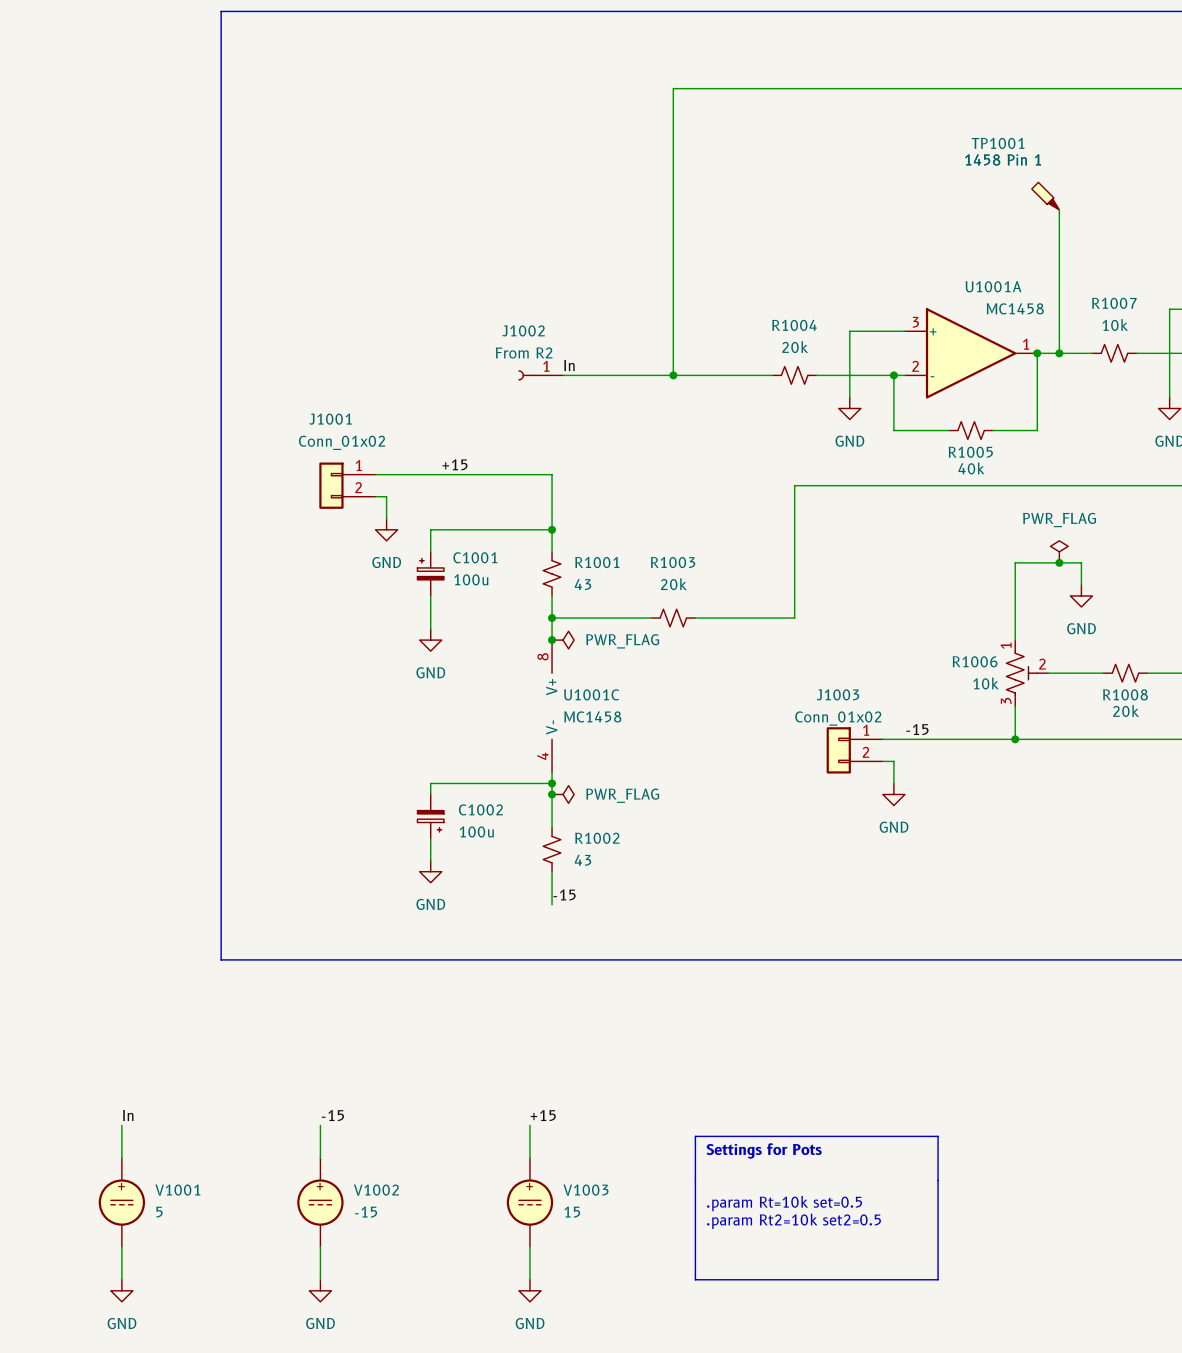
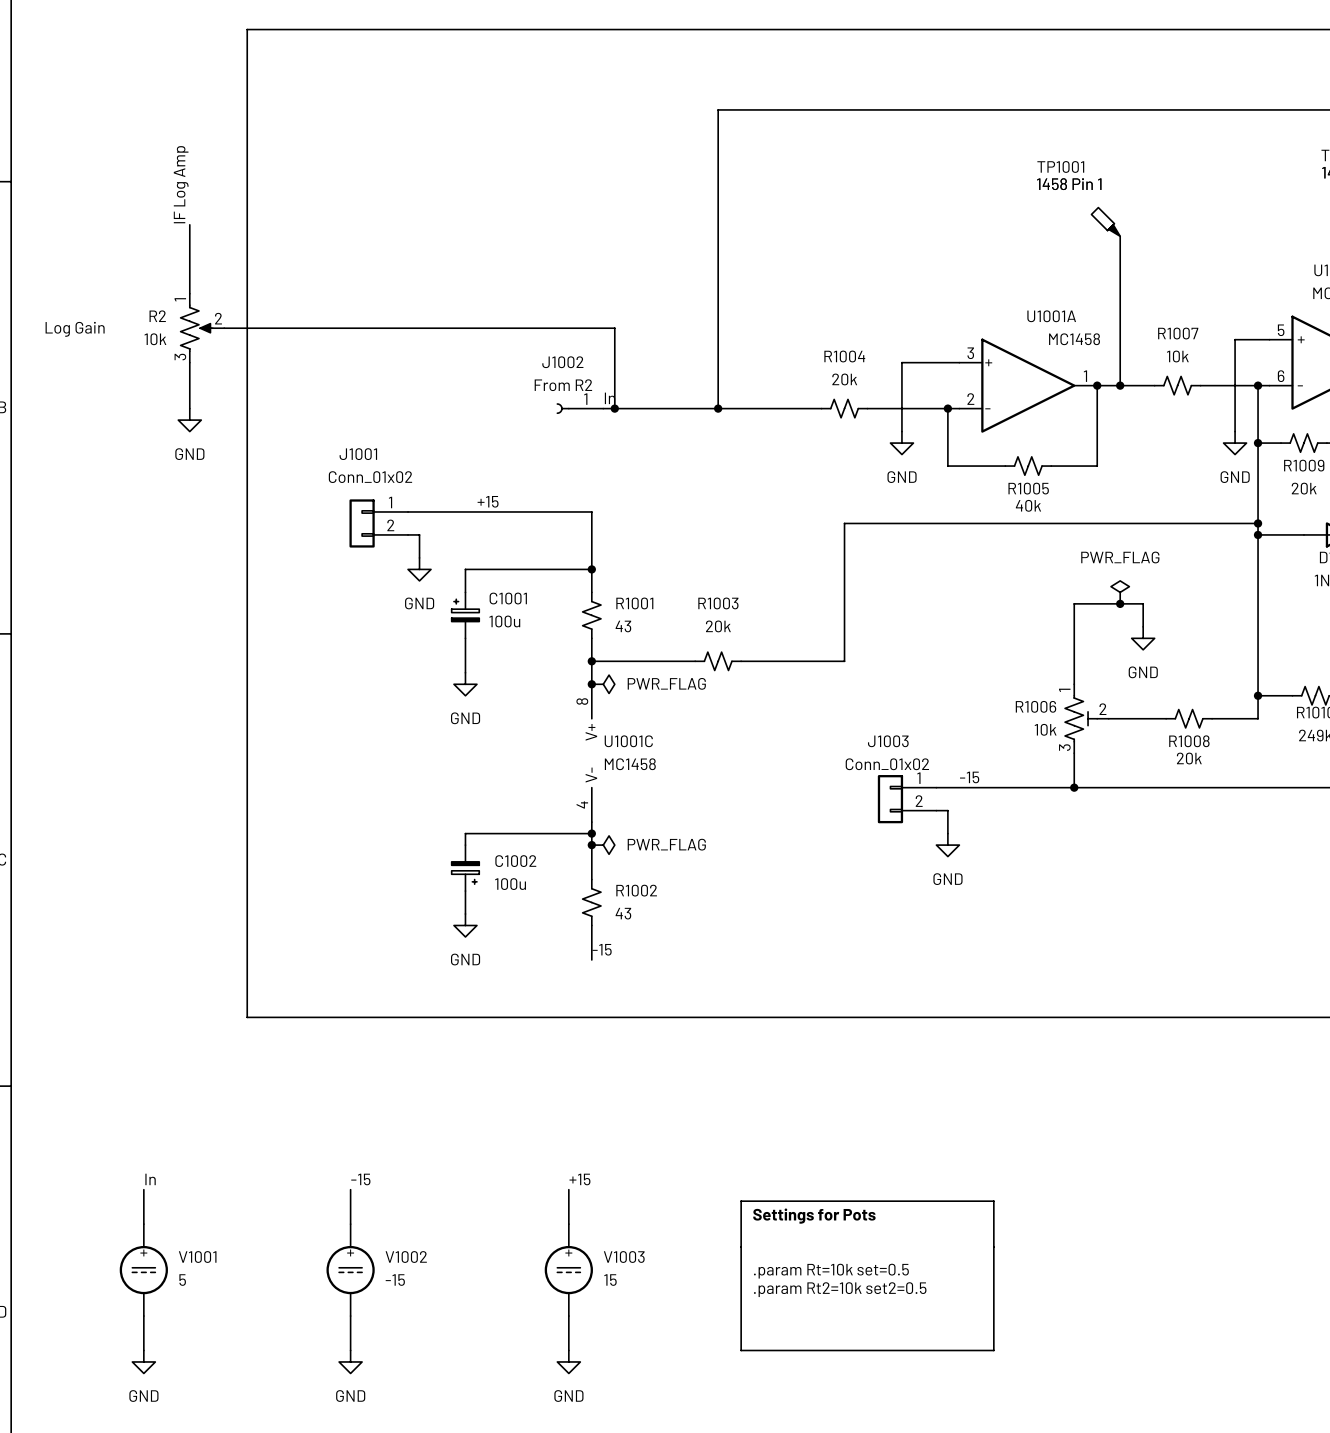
label: none -> IF Log Amp (181, 184)
wire: none -> (189, 224) (189, 293)
R2: none -> 10k (202, 328)
wire: none -> (224, 328) (614, 328) (614, 408)
wire: none -> (189, 362) (189, 408)
junction: none -> (614, 408)
power symbol: none -> GND (189, 420)

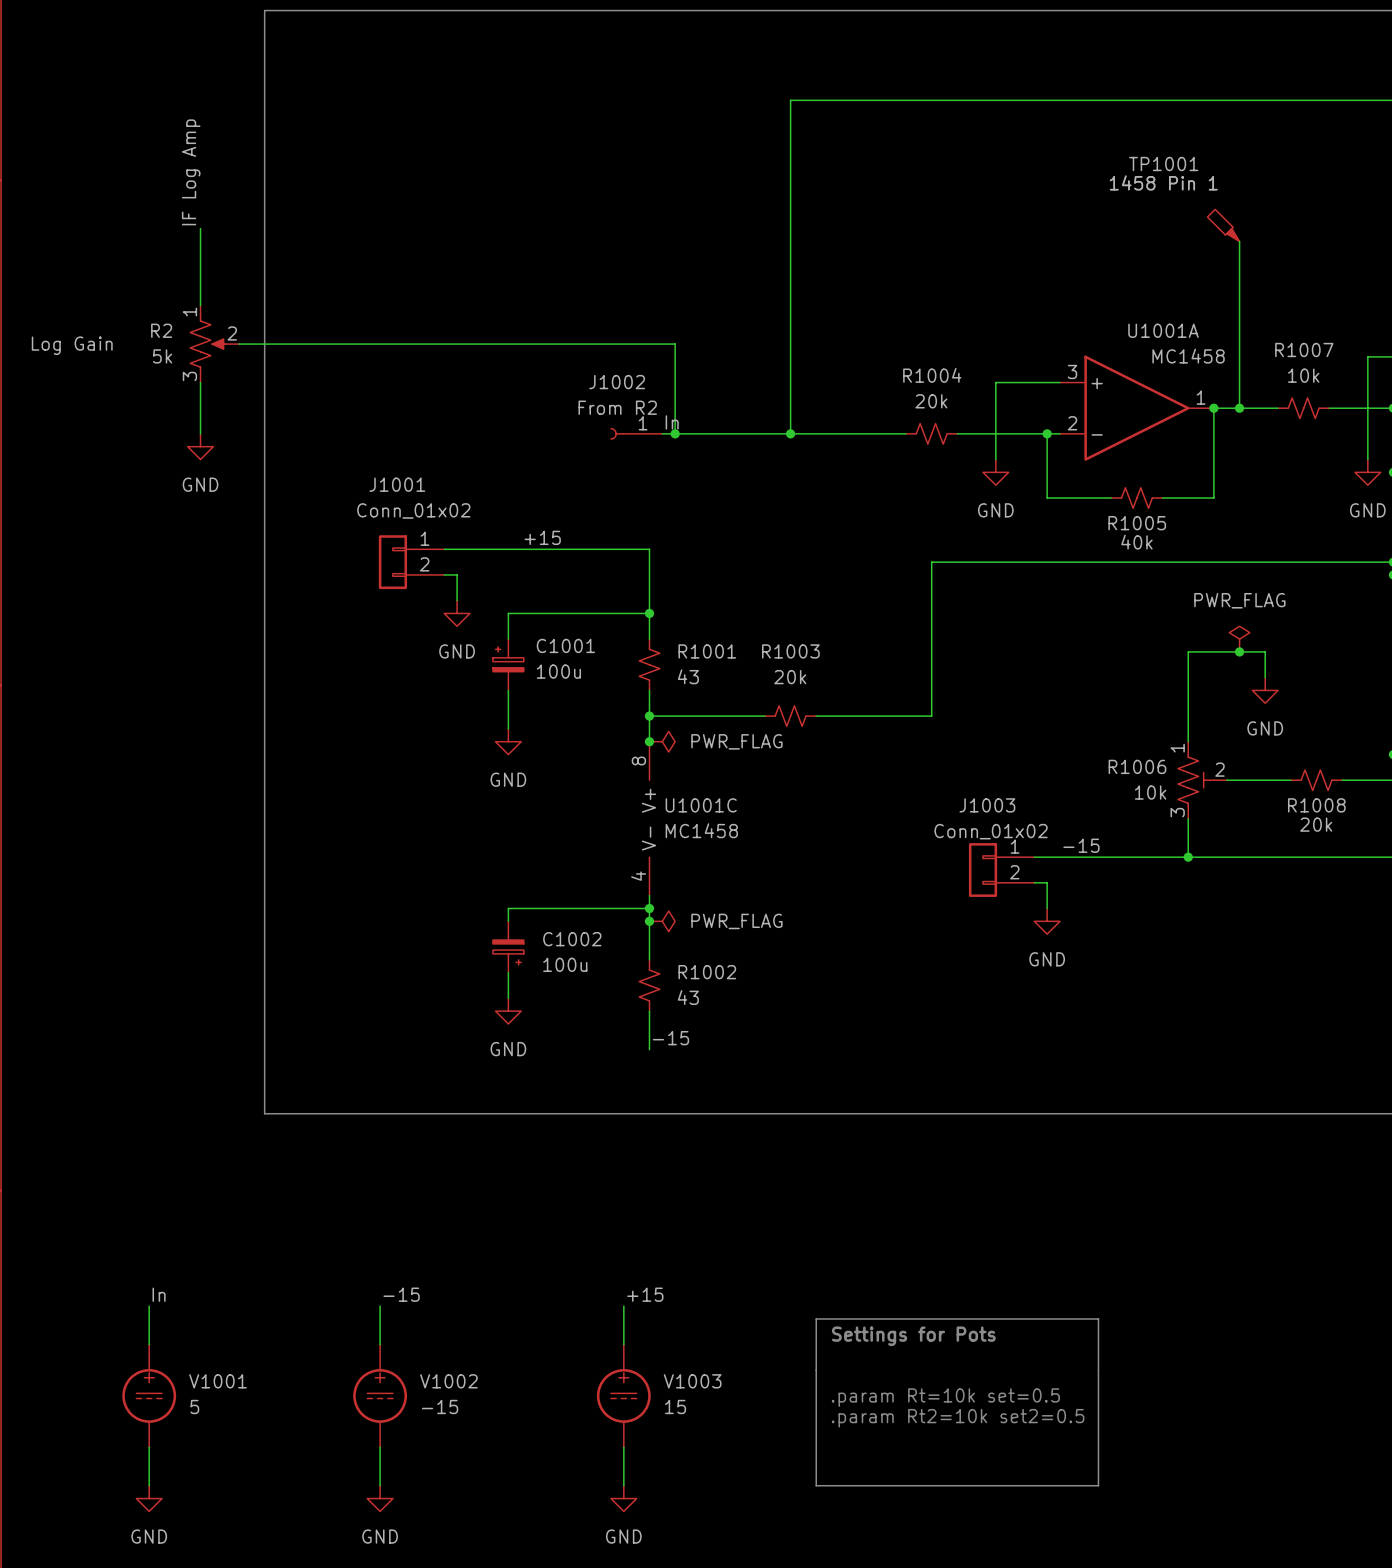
R2 value: 10k (155, 339) -> 5k (162, 356)

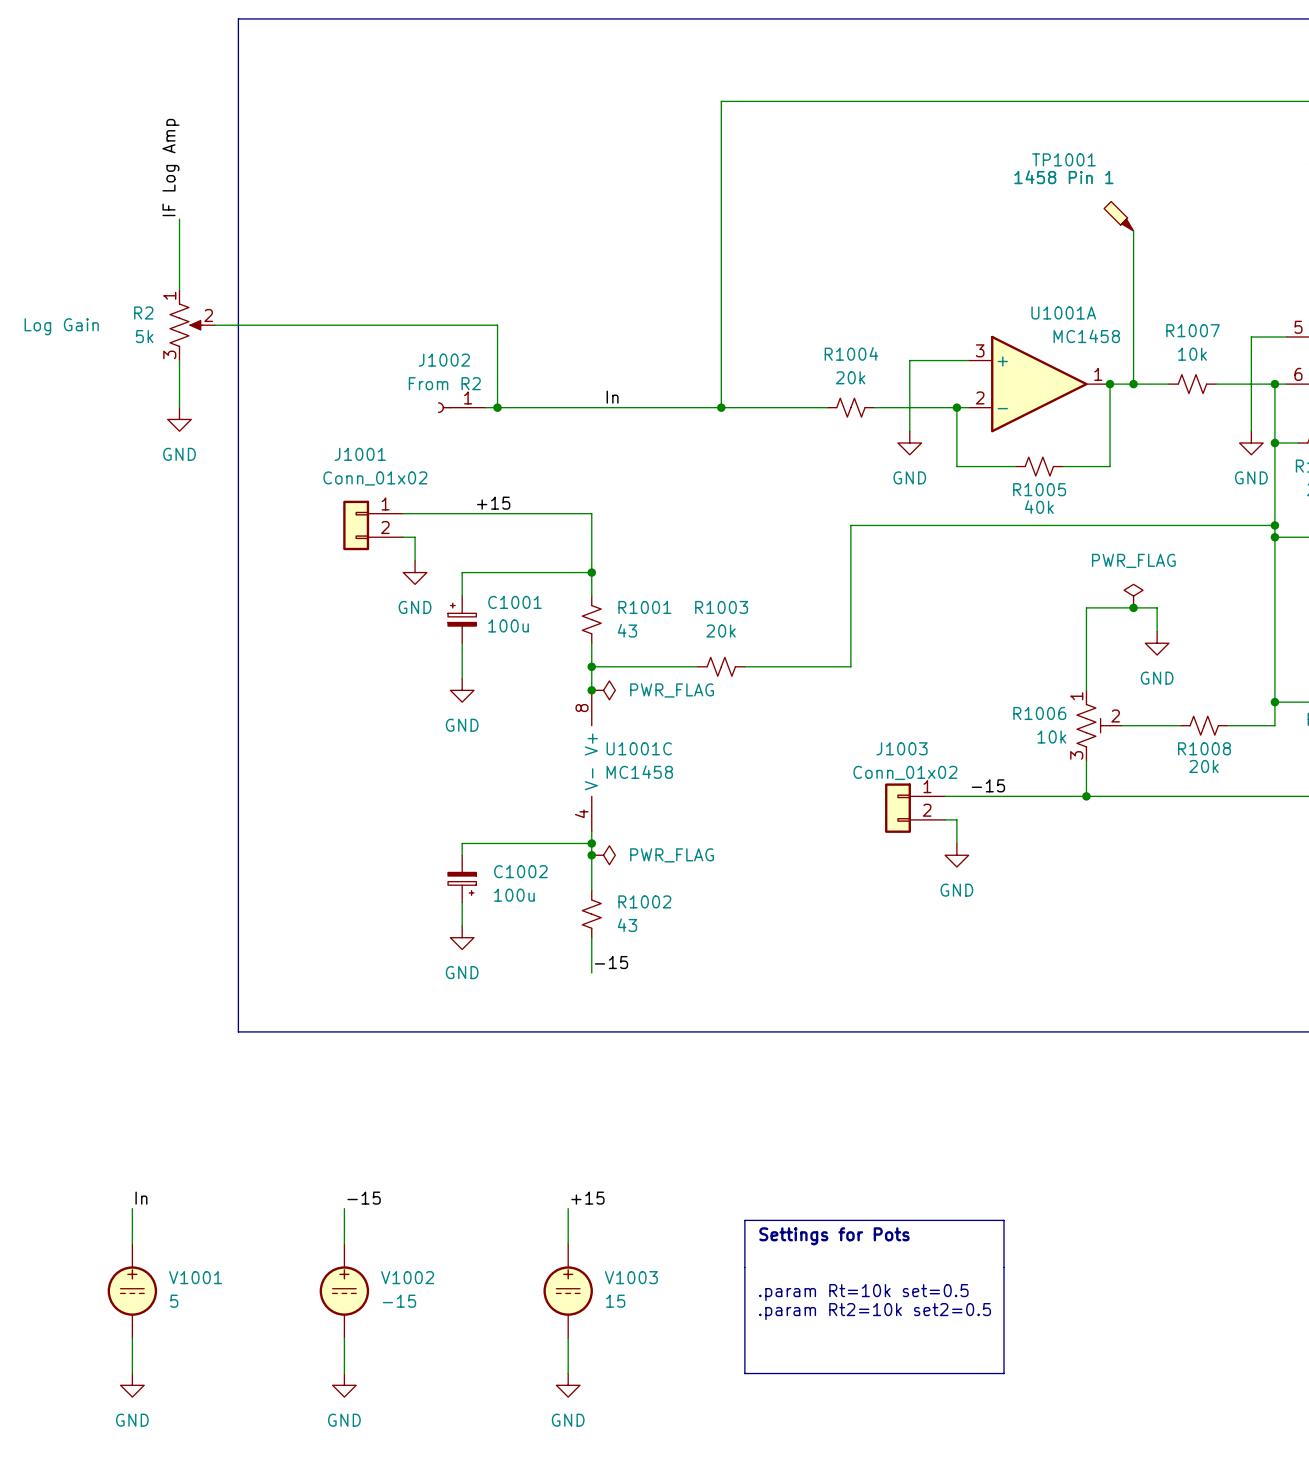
wire: (546, 344) (675, 344) (675, 433) -> (497, 325) (497, 407)
wire: none -> (485, 407) (603, 407)
junction: none -> (497, 407)
J1002 position: (636, 433) -> (461, 407)
junction: (675, 433) -> none

